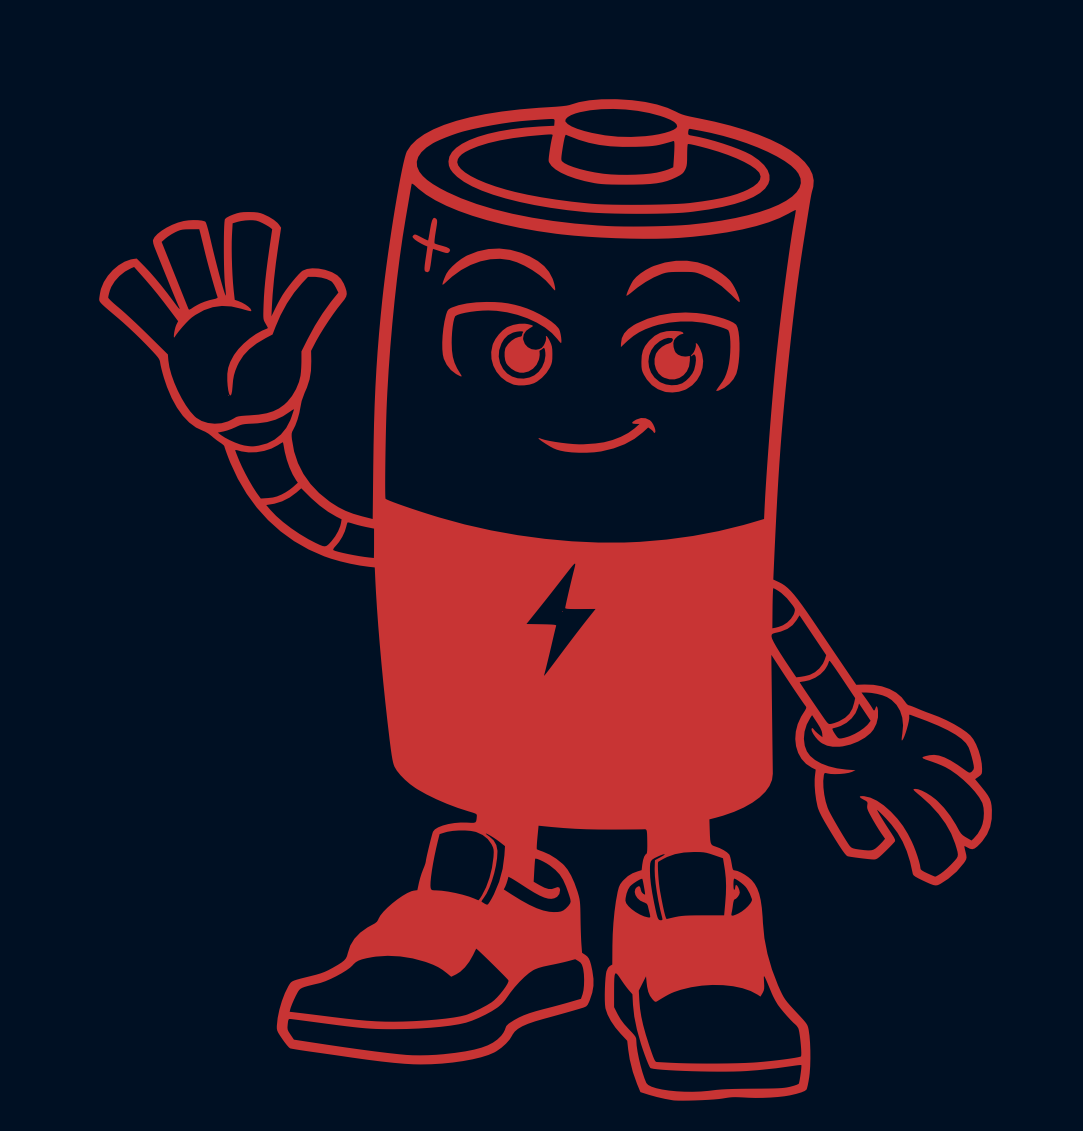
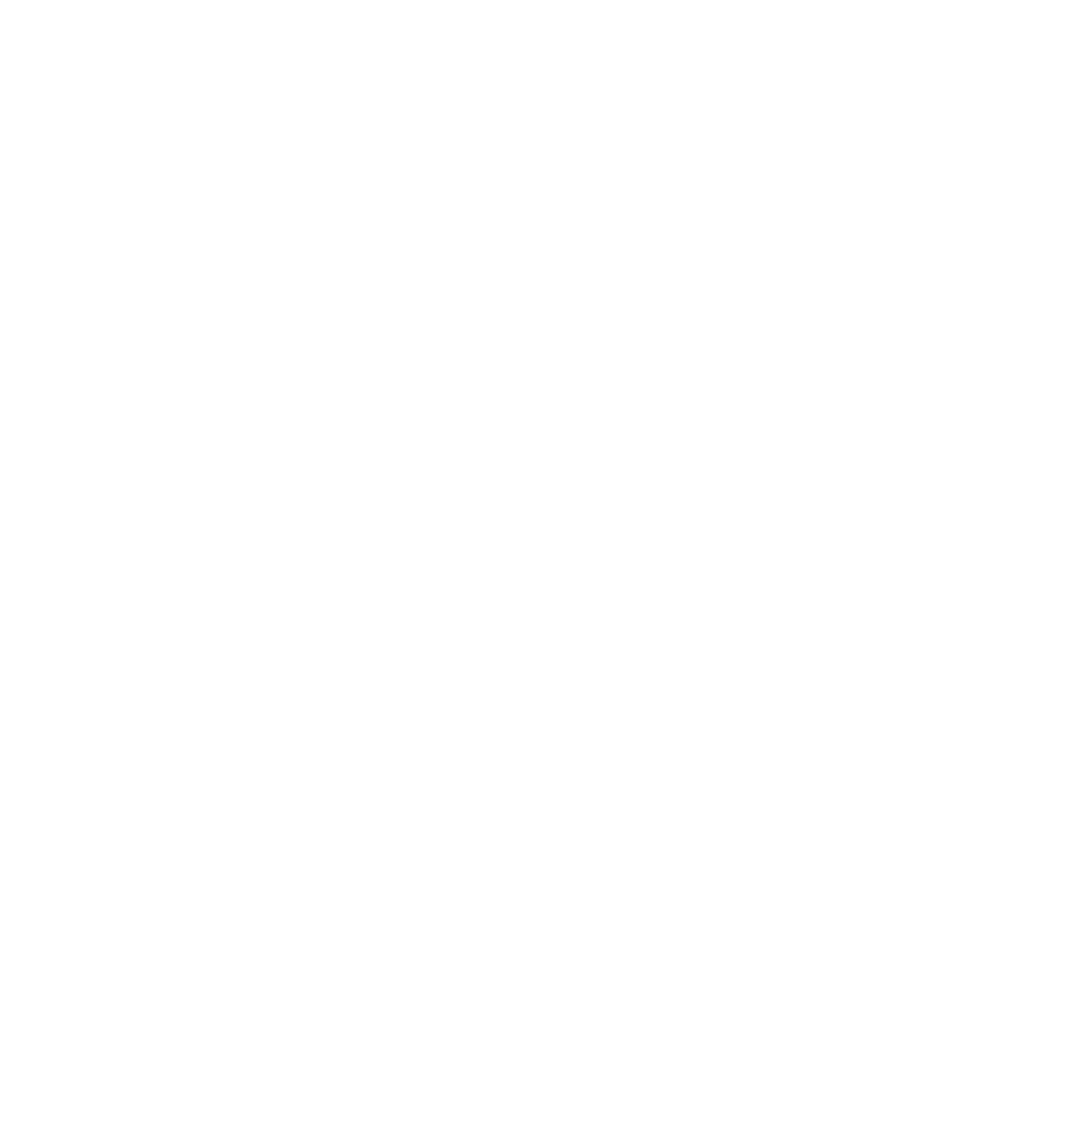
drawing: [99, 99, 992, 1101] -> none

